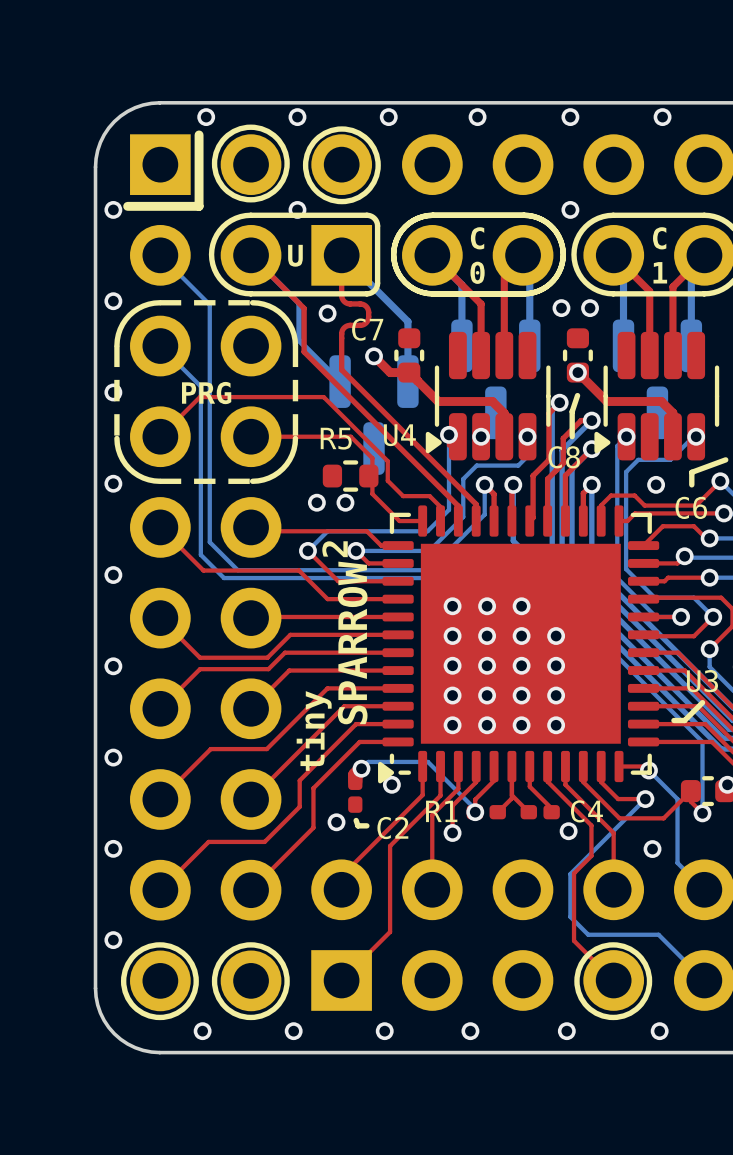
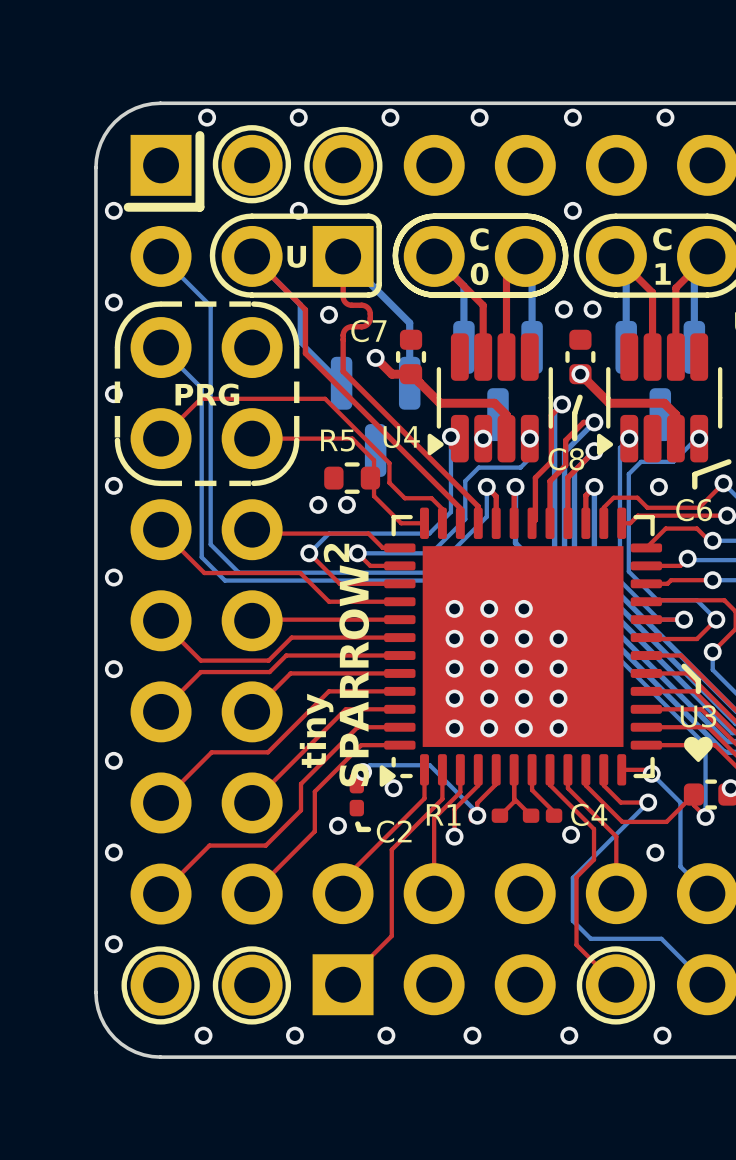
line: none -> (684, 666) (698, 680) (698, 691)
U3 name position: U3 (702, 681) -> U3 (698, 716)
line: (702, 702) (684, 720) (673, 720) -> none
drawing: none -> [684, 736, 713, 762]

